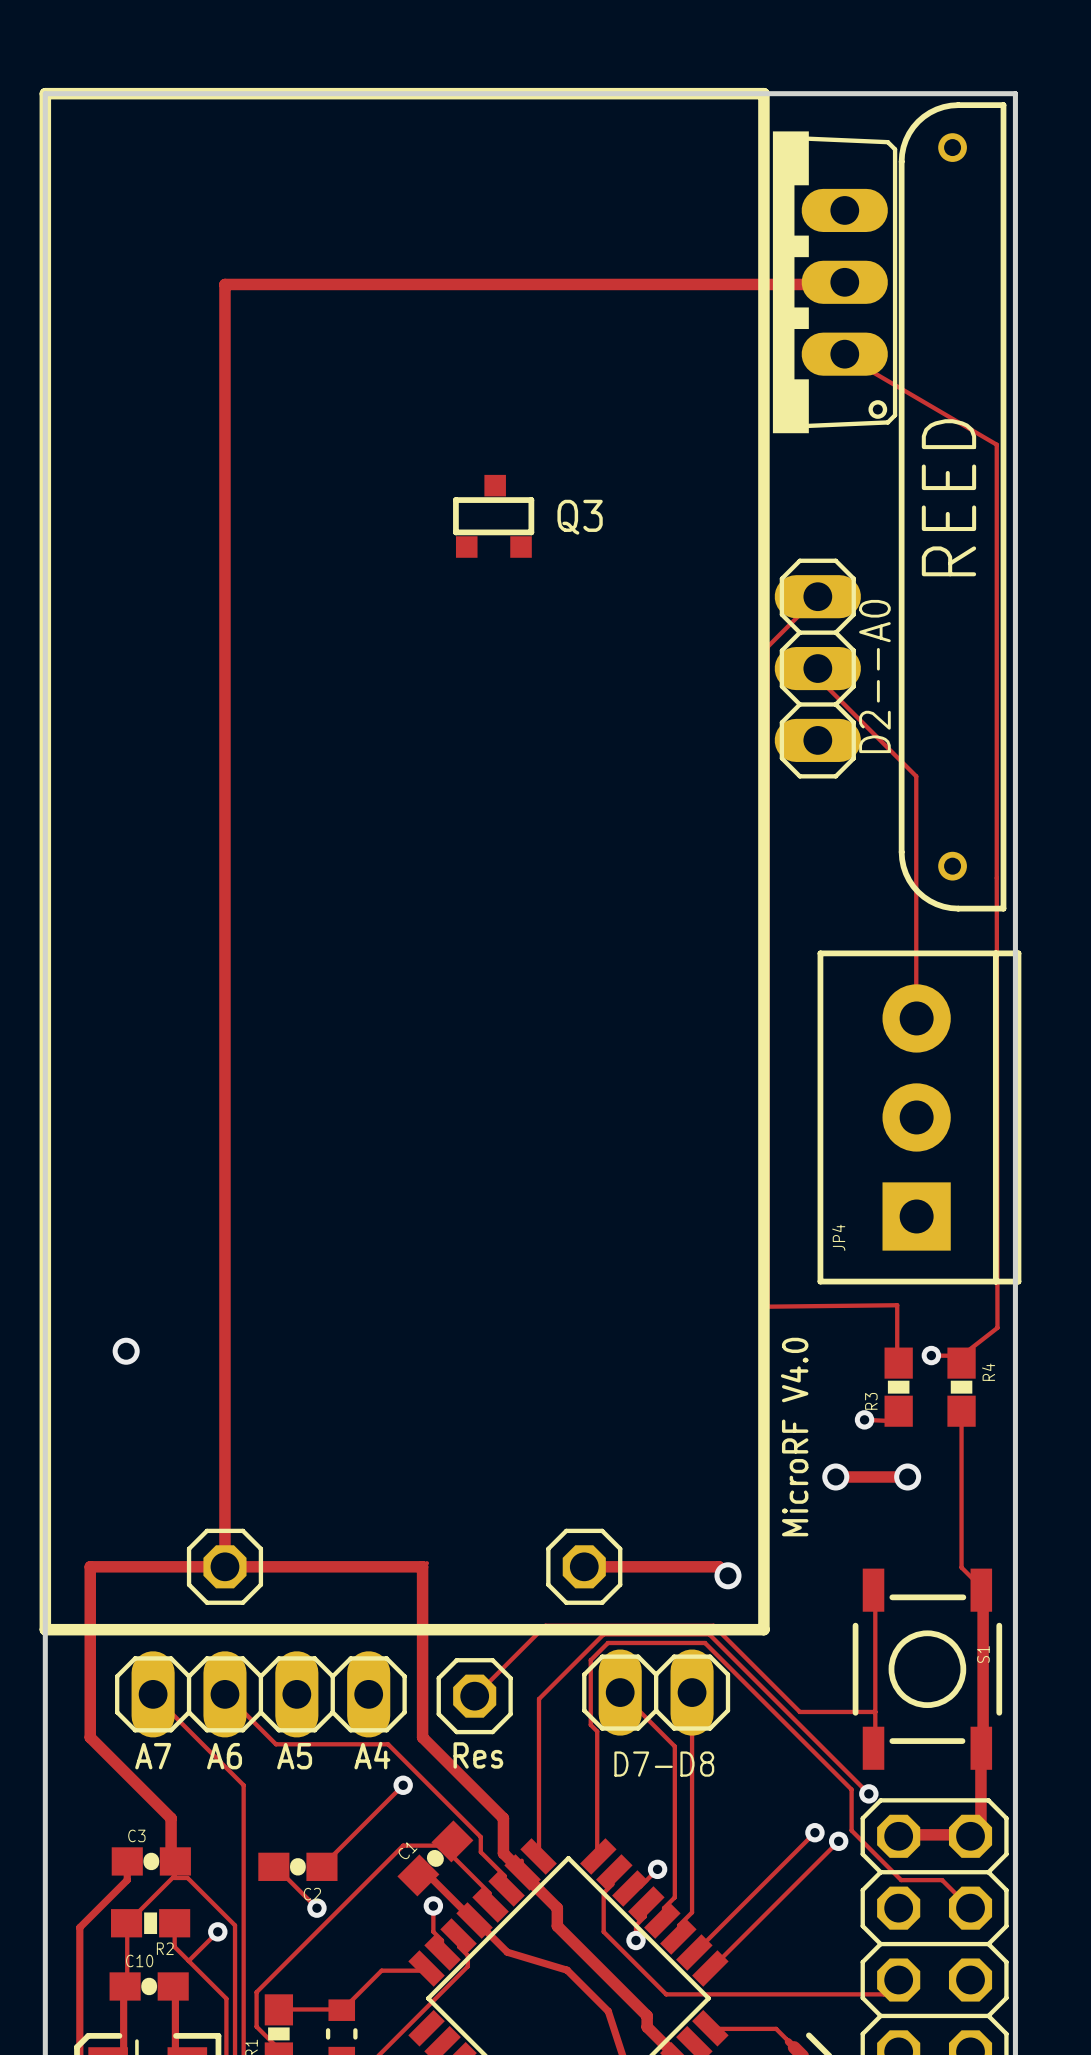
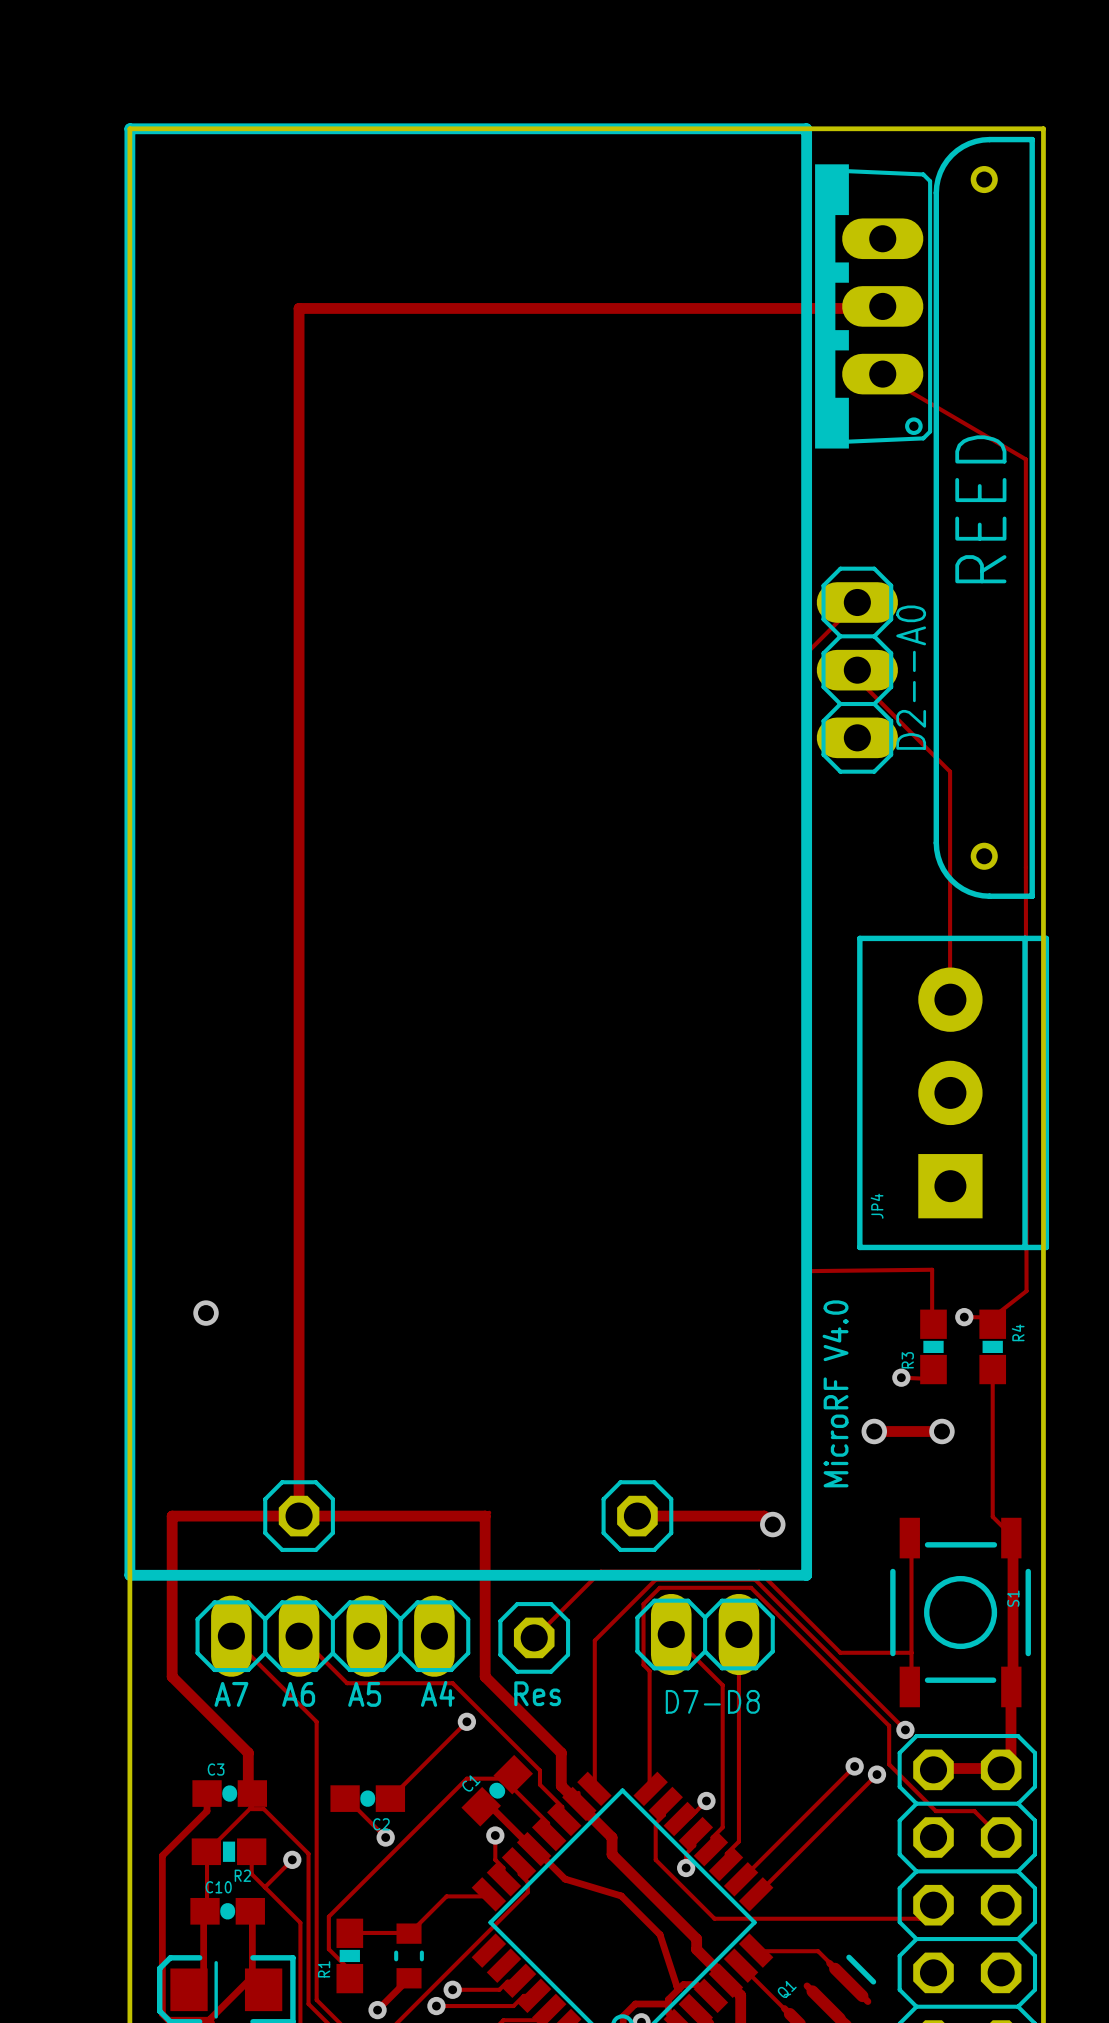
Q3: (493, 516) -> none

